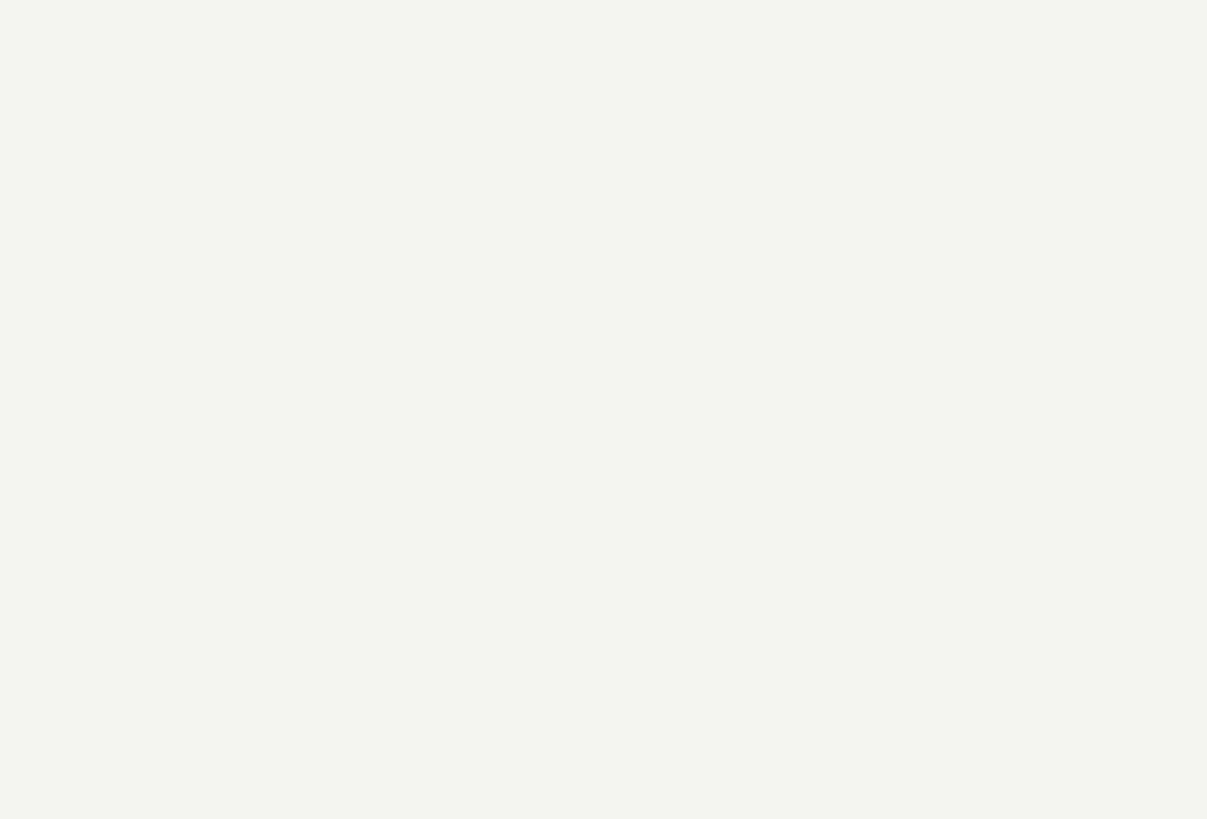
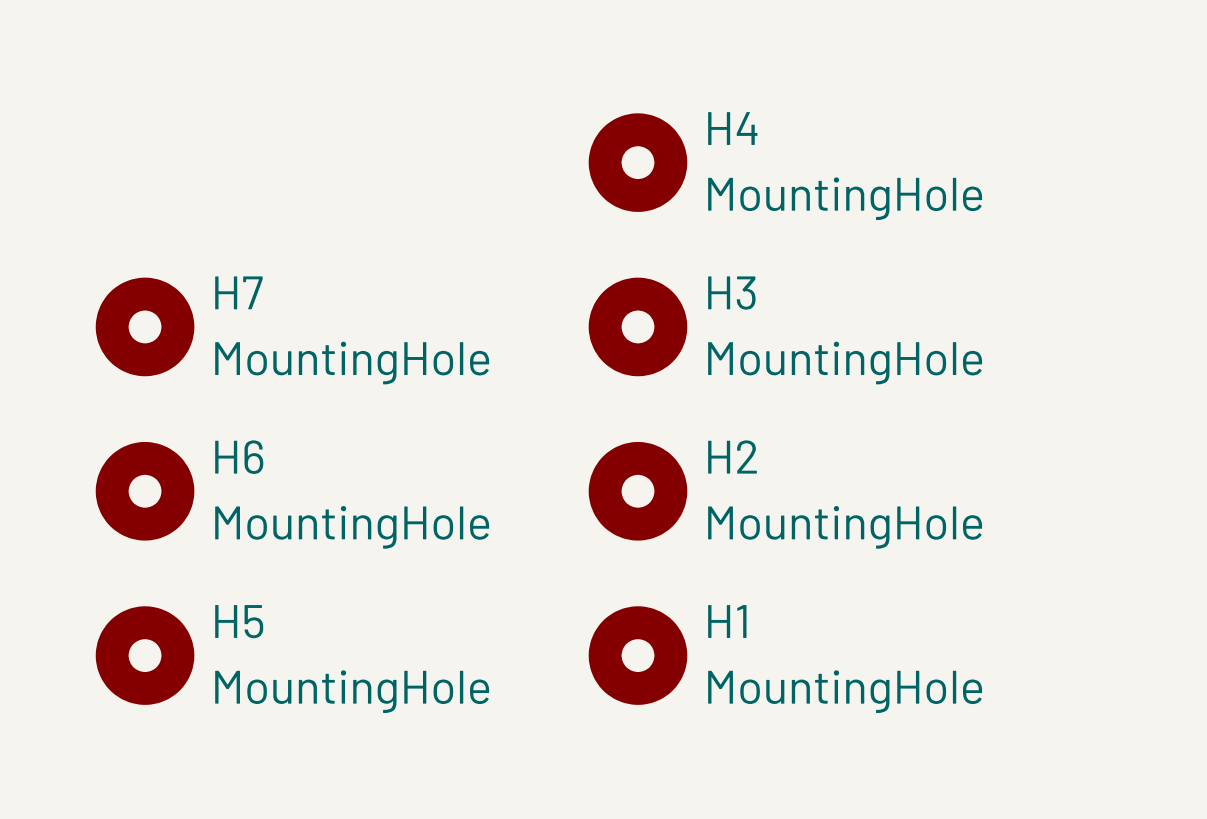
H4: none -> MountingHole (638, 162)
H7: none -> MountingHole (145, 326)
H3: none -> MountingHole (638, 326)
H6: none -> MountingHole (145, 491)
H2: none -> MountingHole (638, 491)
H5: none -> MountingHole (145, 655)
H1: none -> MountingHole (638, 655)

